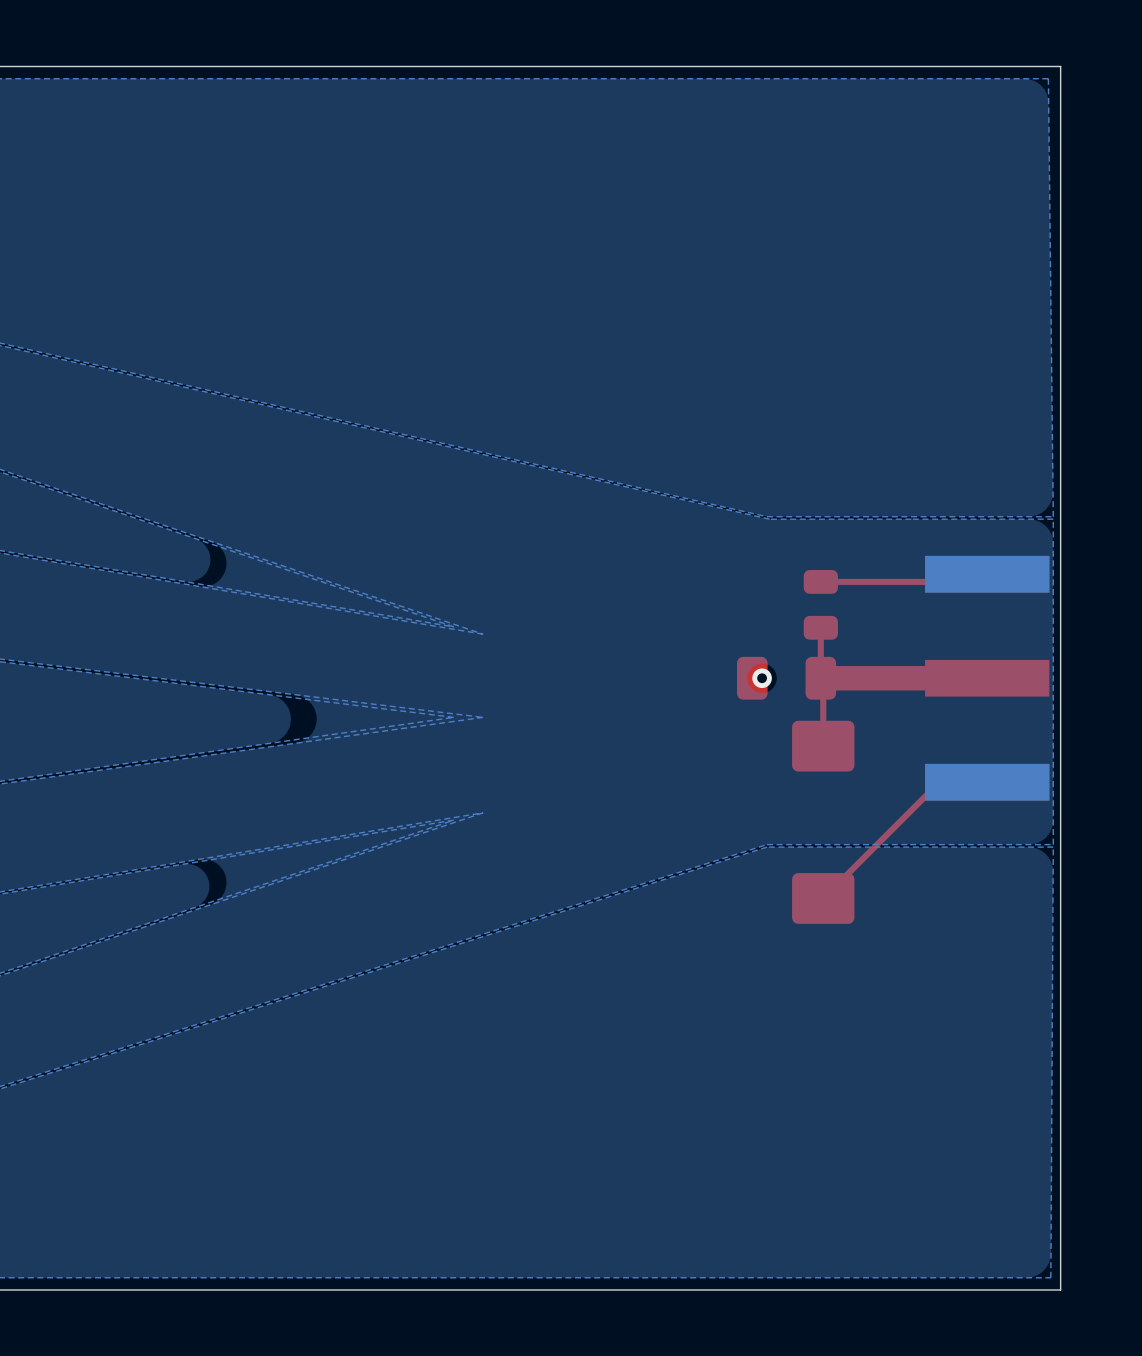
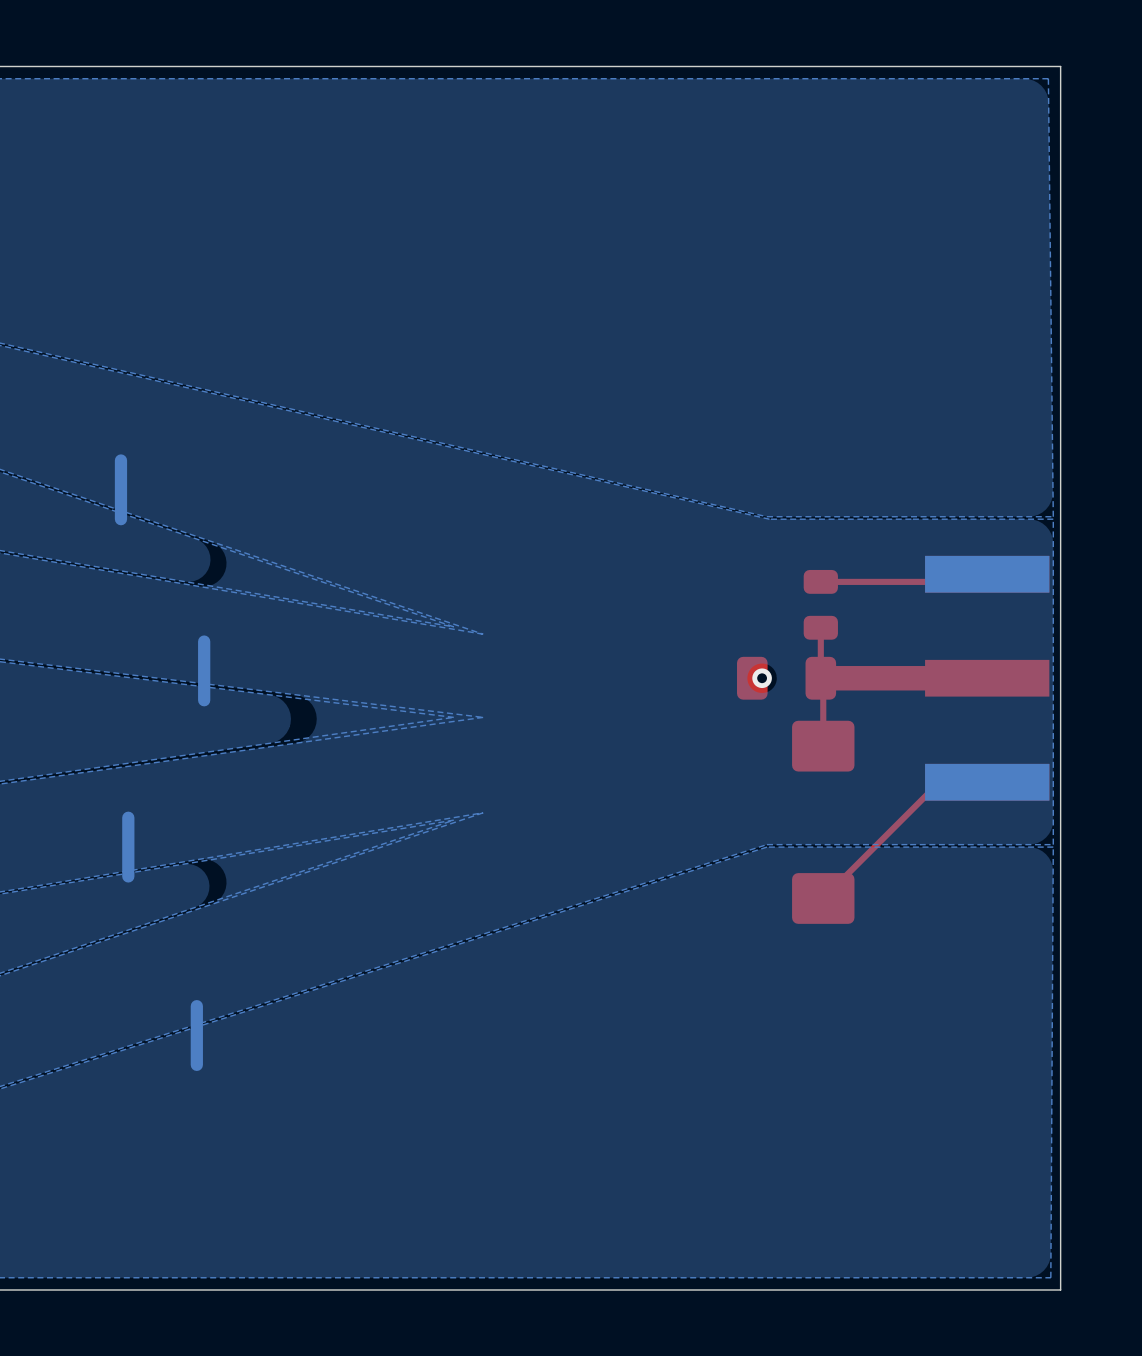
bottom track: none -> (120, 460) (120, 519)
bottom track: none -> (204, 641) (204, 700)
bottom track: none -> (128, 817) (128, 876)
bottom track: none -> (196, 1006) (196, 1064)

